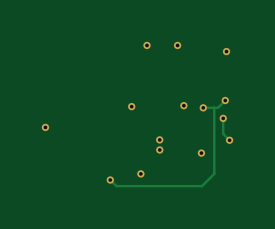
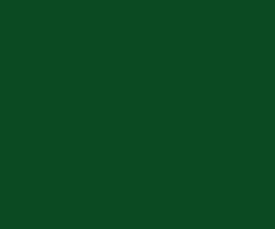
via: (146, 45) -> none
via: (177, 45) -> none
via: (226, 51) -> none
track: (225, 100) (217, 107) (203, 107) -> none
via: (225, 100) -> none
via: (183, 105) -> none
via: (131, 106) -> none
via: (203, 107) -> none
track: (214, 107) (214, 173) (202, 186) (116, 186) (110, 180) -> none
track: (223, 118) (223, 133) (229, 140) -> none
via: (223, 118) -> none
via: (45, 127) -> none
via: (159, 139) -> none
via: (229, 140) -> none
via: (159, 149) -> none
via: (201, 153) -> none
via: (140, 173) -> none
via: (110, 180) -> none

